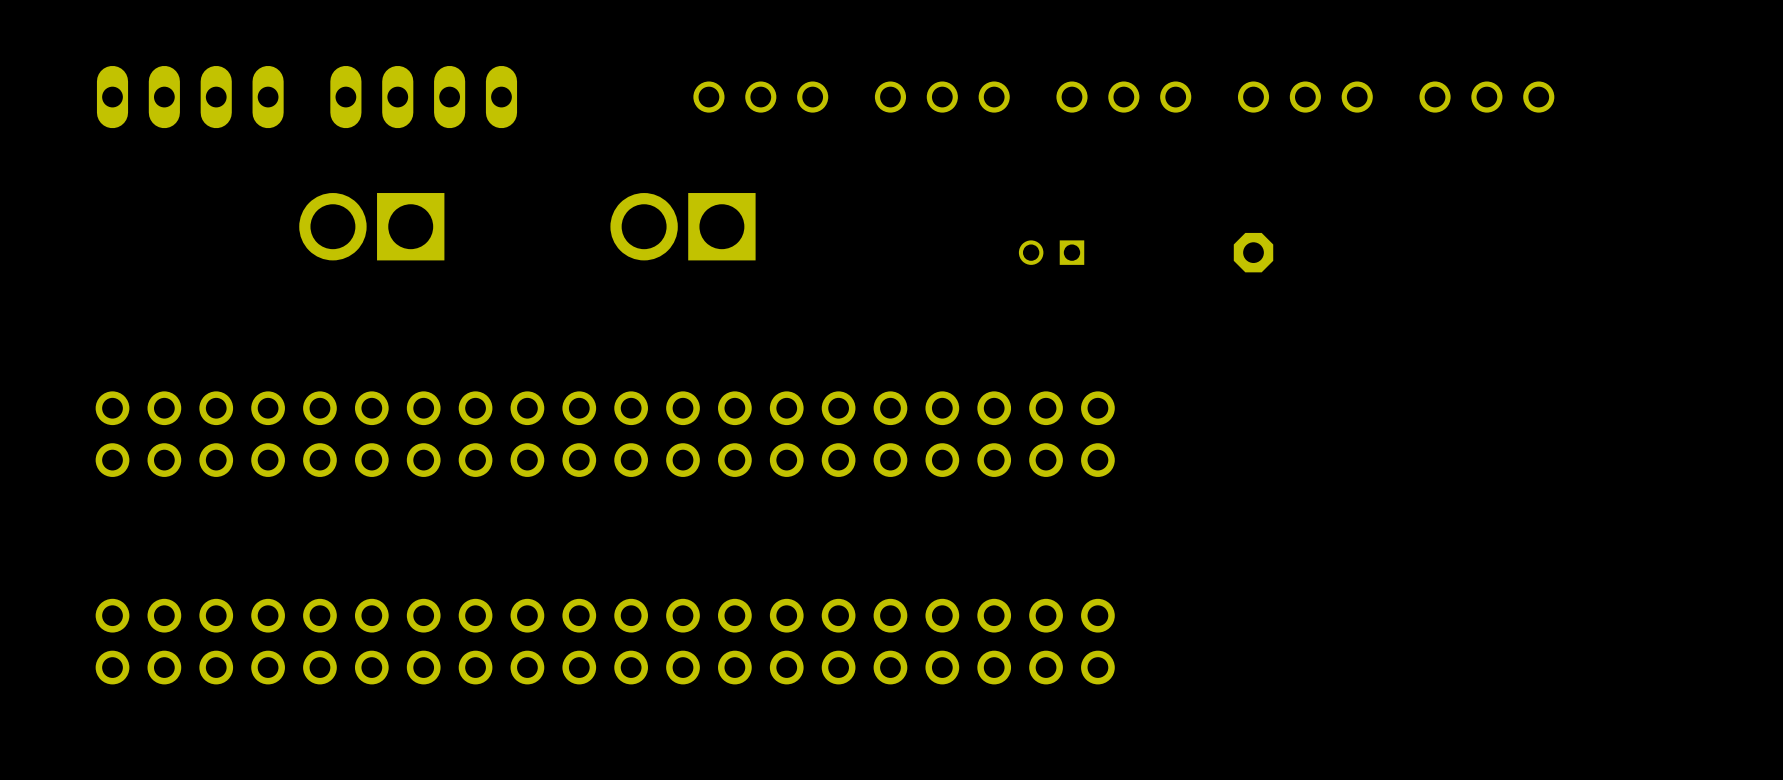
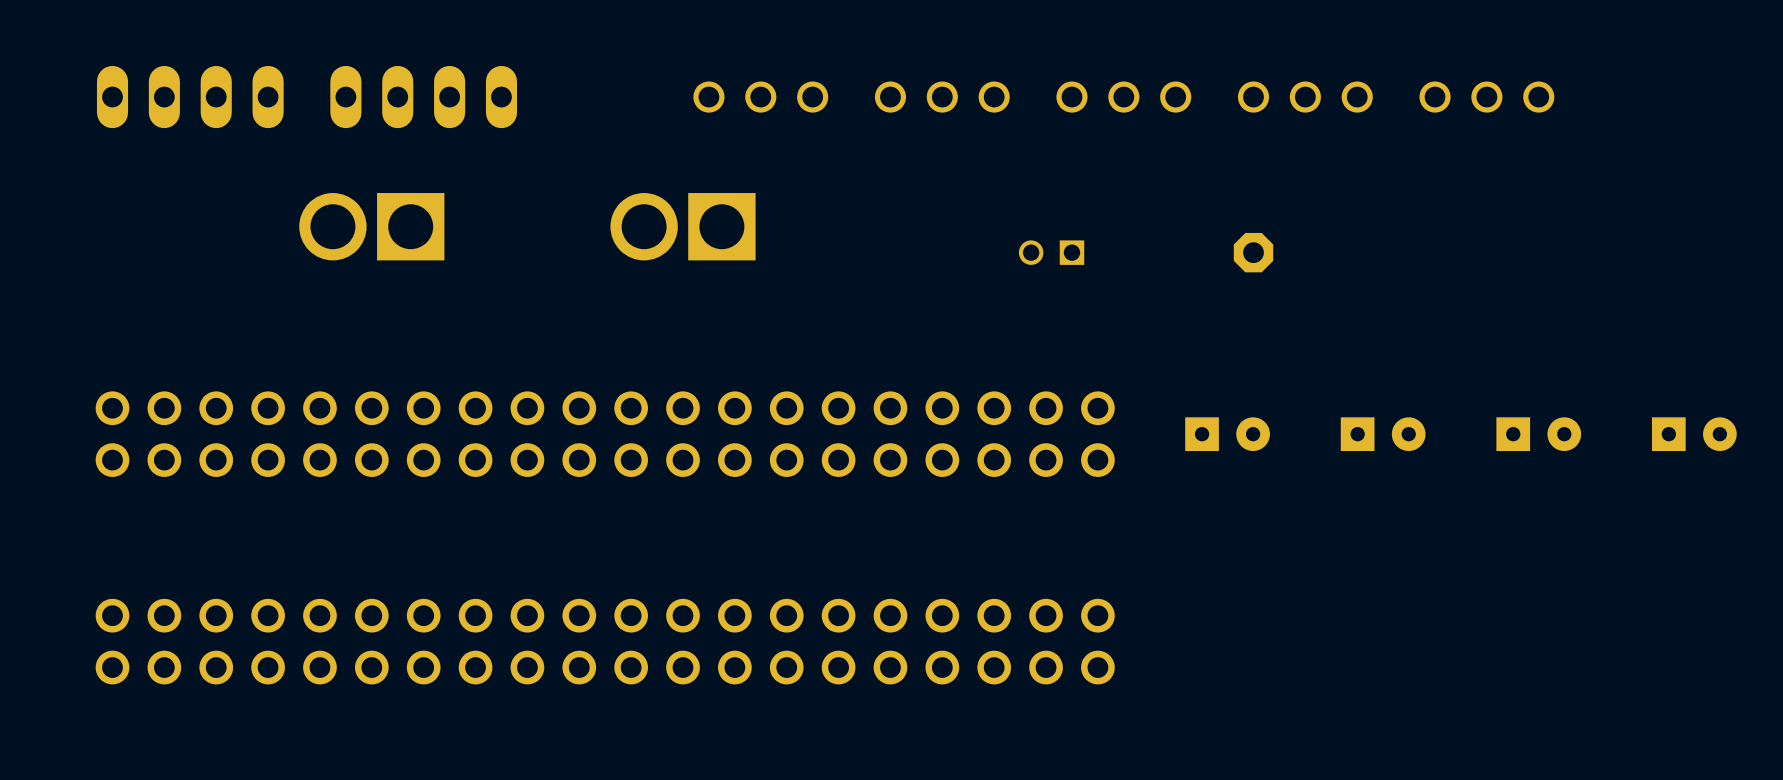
part: none -> (1227, 434)
part: none -> (1383, 434)
part: none -> (1538, 434)
part: none -> (1694, 434)

